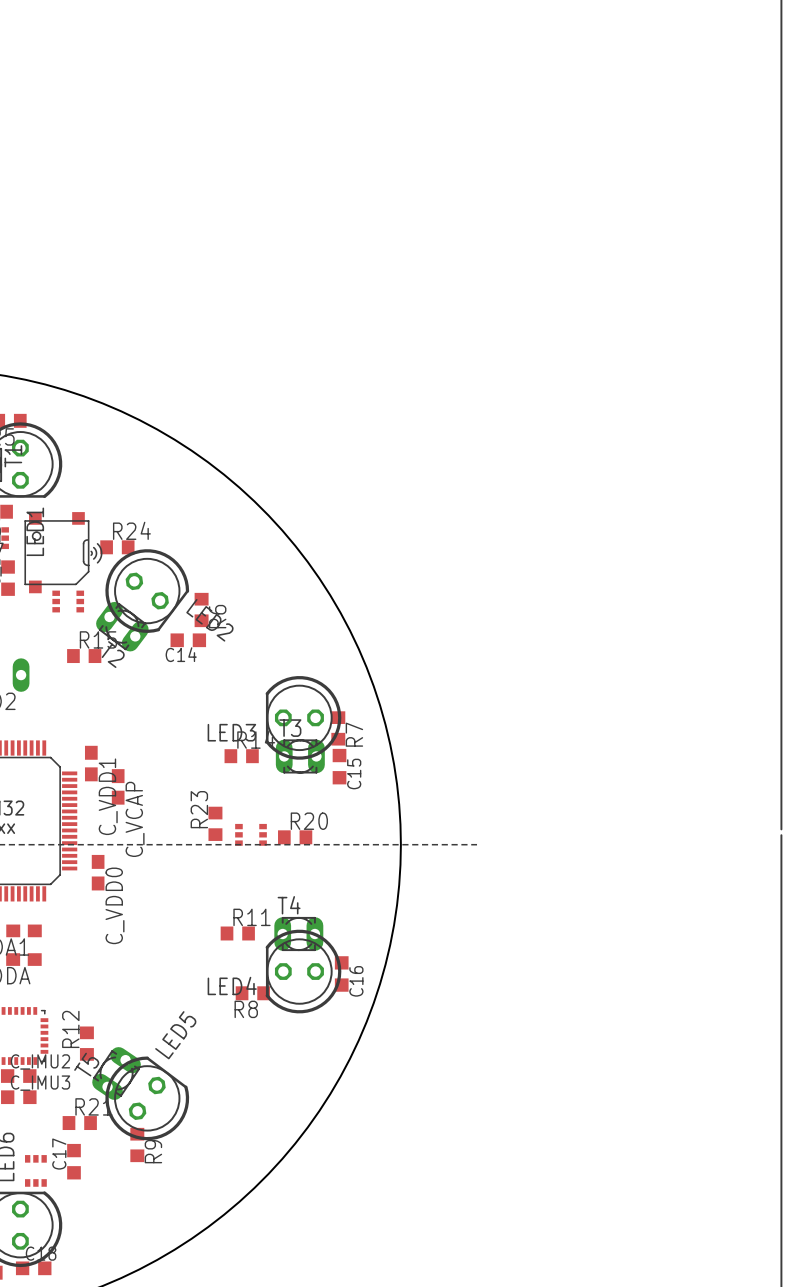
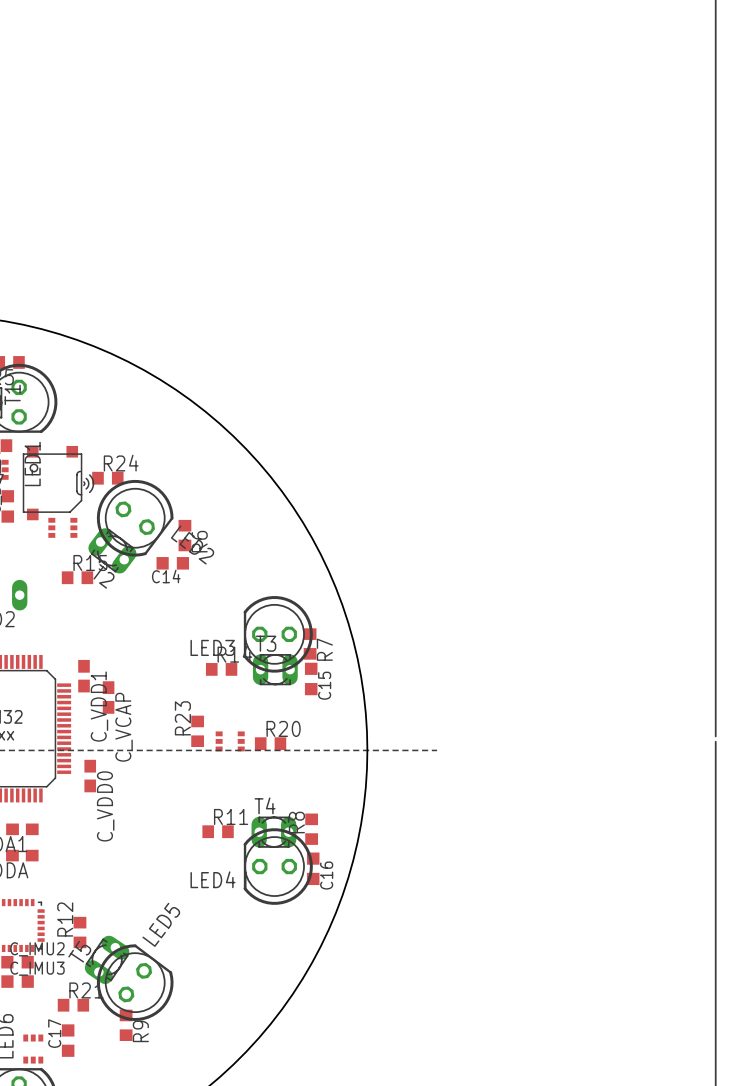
R8 rotation: 0° (252, 993) -> 90° clockwise (311, 829)
R8 position: (252, 993) -> (311, 829)

